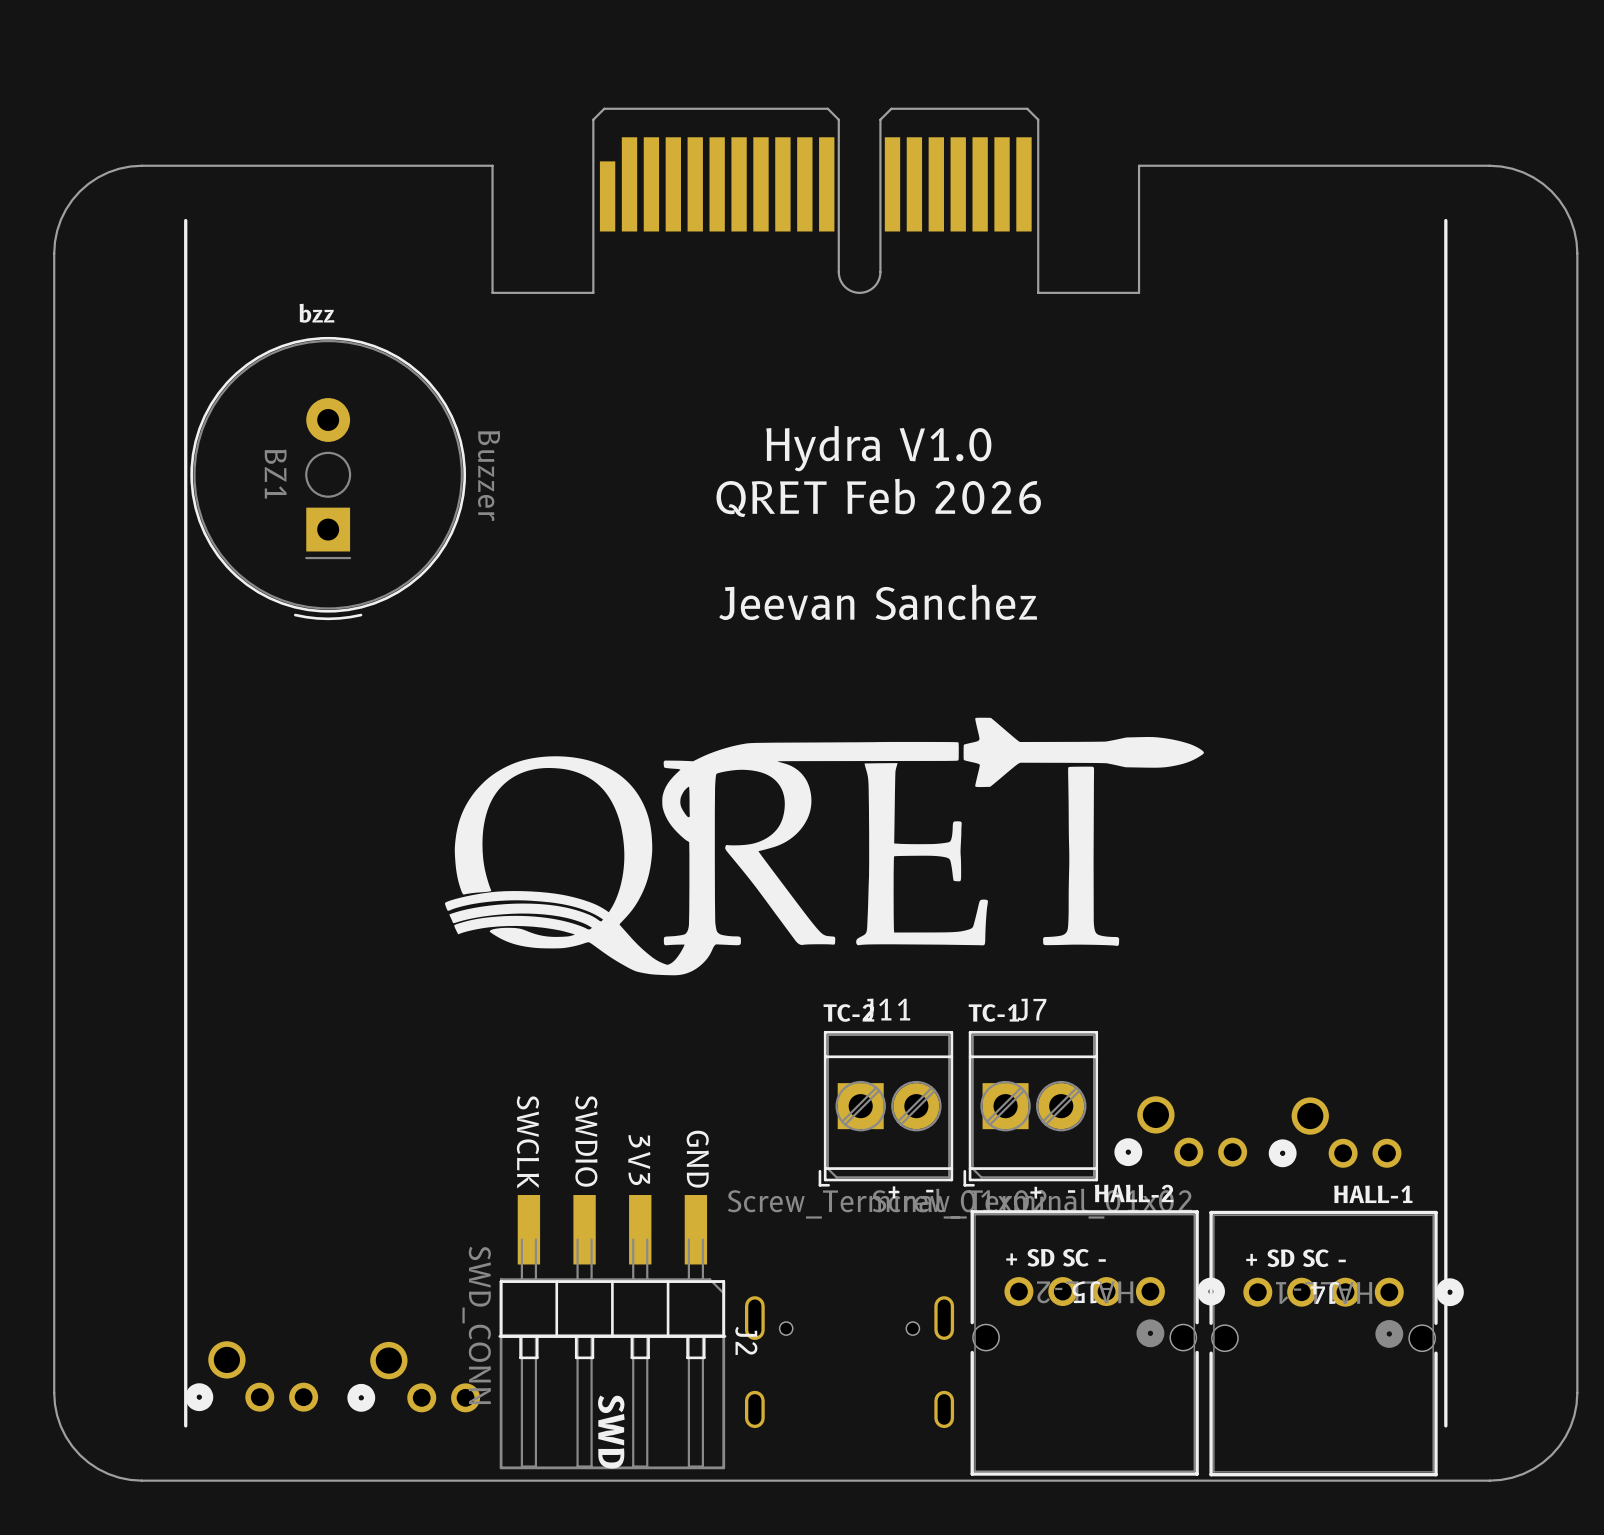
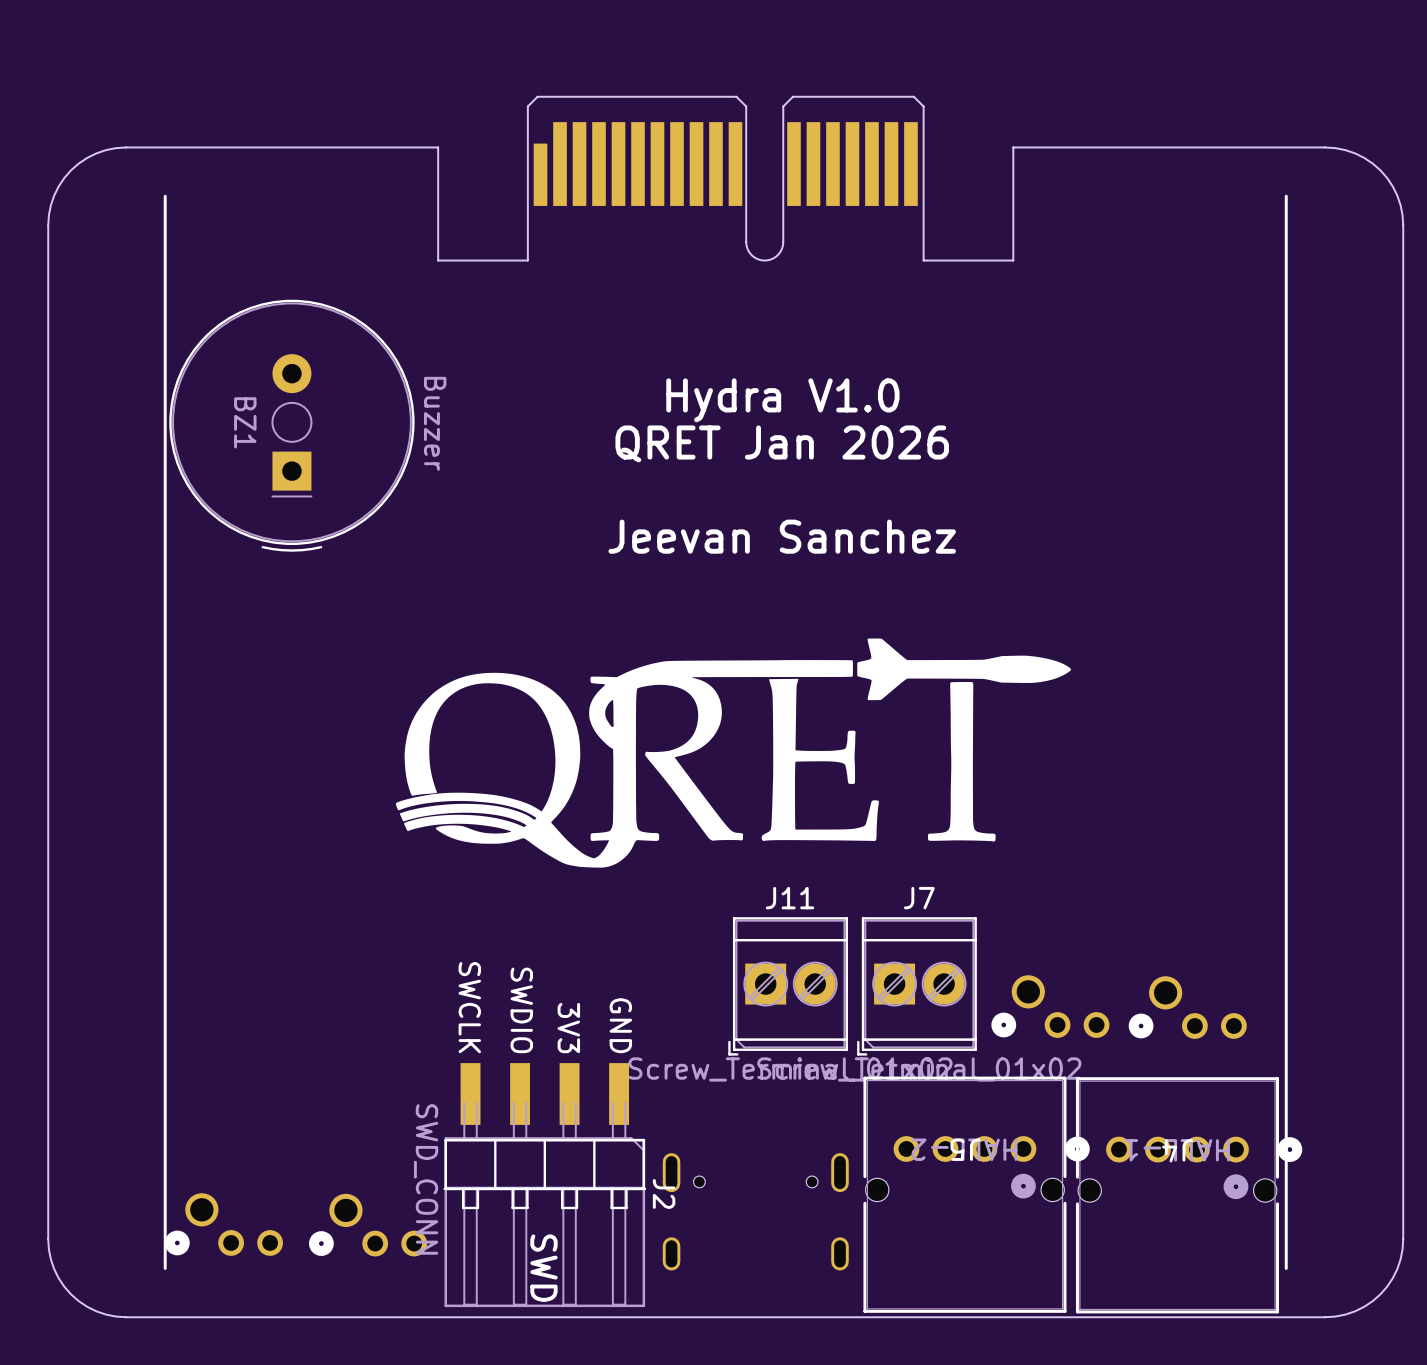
text: bzz (317, 313) -> none
text: QRET Feb 2026 (878, 497) -> QRET Jan 2026 (782, 443)
text: TC-2 (848, 1012) -> none
text: TC-1 (993, 1012) -> none
text: - + (910, 1192) -> none
text: - + (1052, 1192) -> none
text: HALL-2 (1134, 1193) -> none
text: HALL-1 (1373, 1194) -> none
text: + SD SC - (1056, 1257) -> none
text: + SD SC - (1296, 1258) -> none

